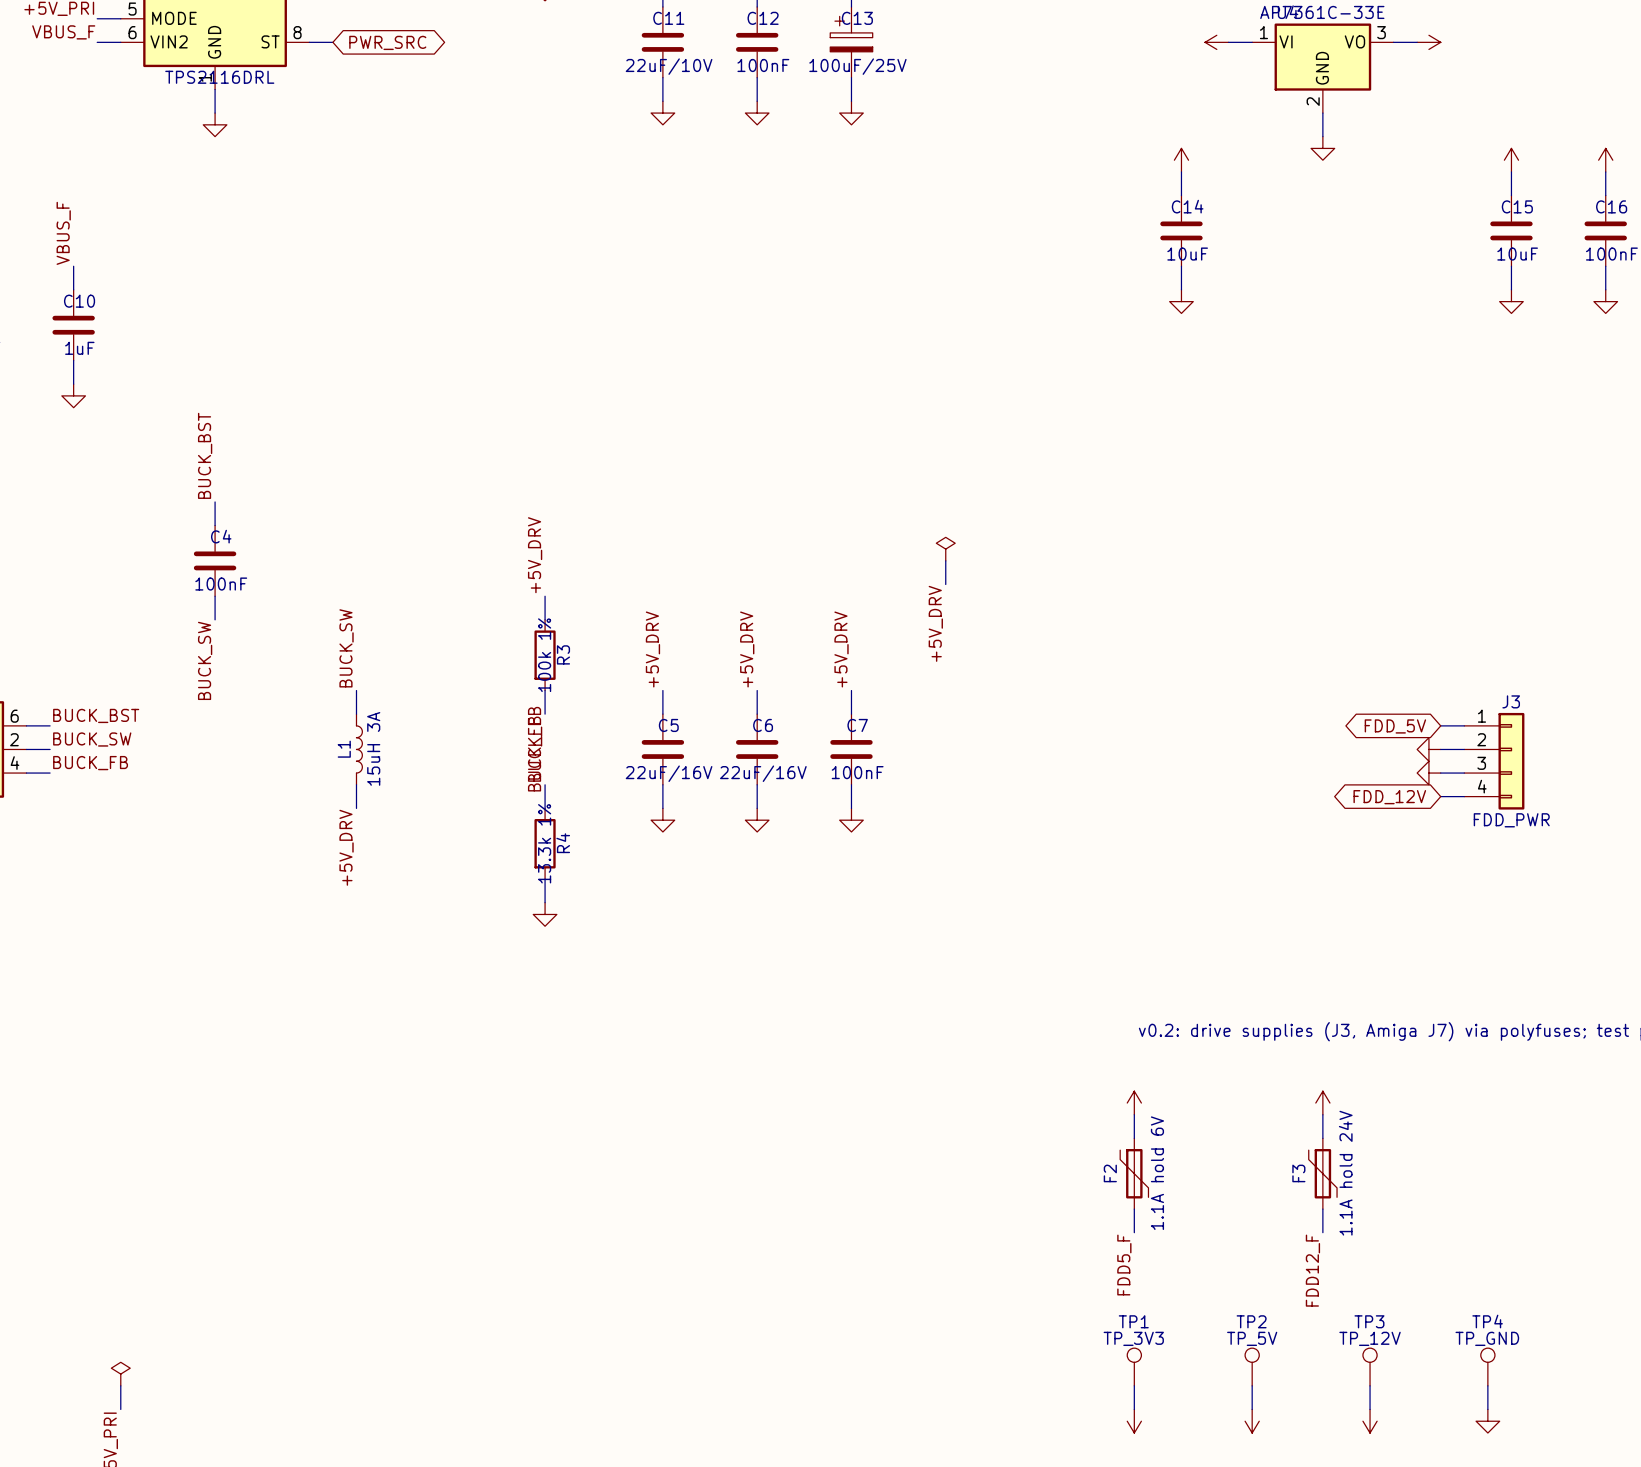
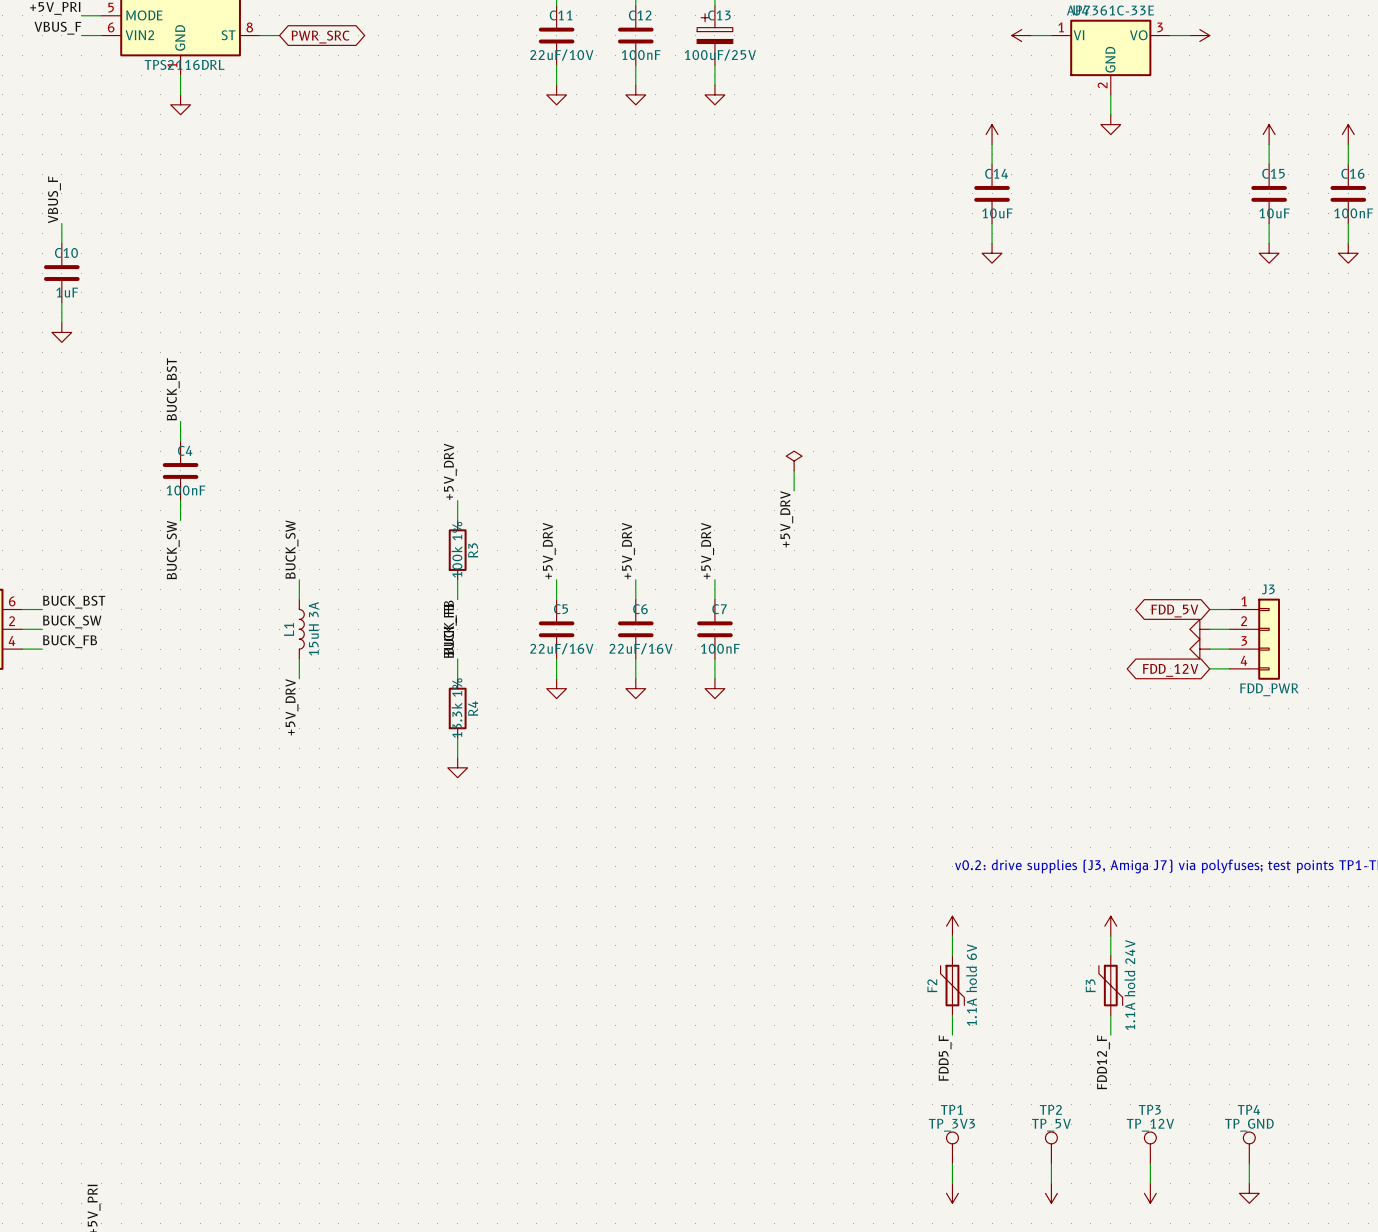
power symbol: (120, 1374) -> none
wire: (120, 1385) (120, 1409) -> none

